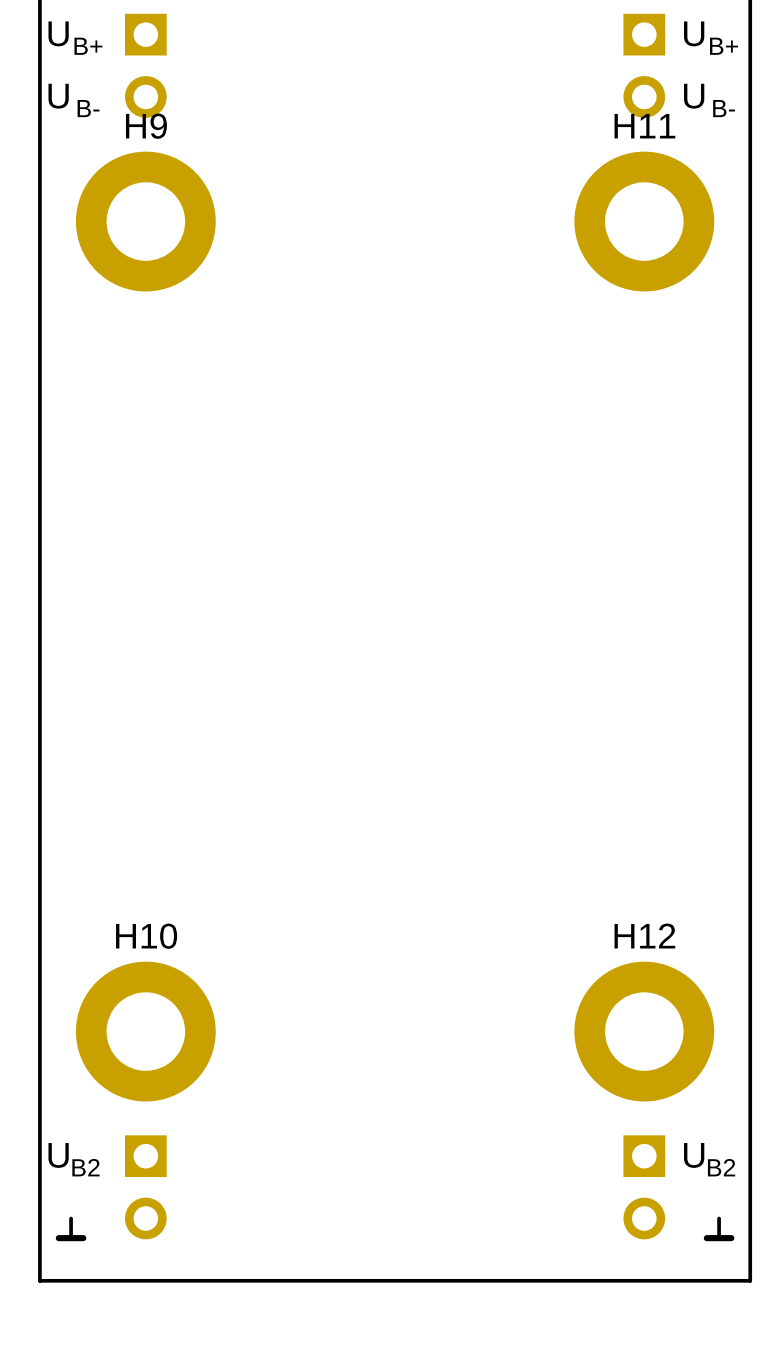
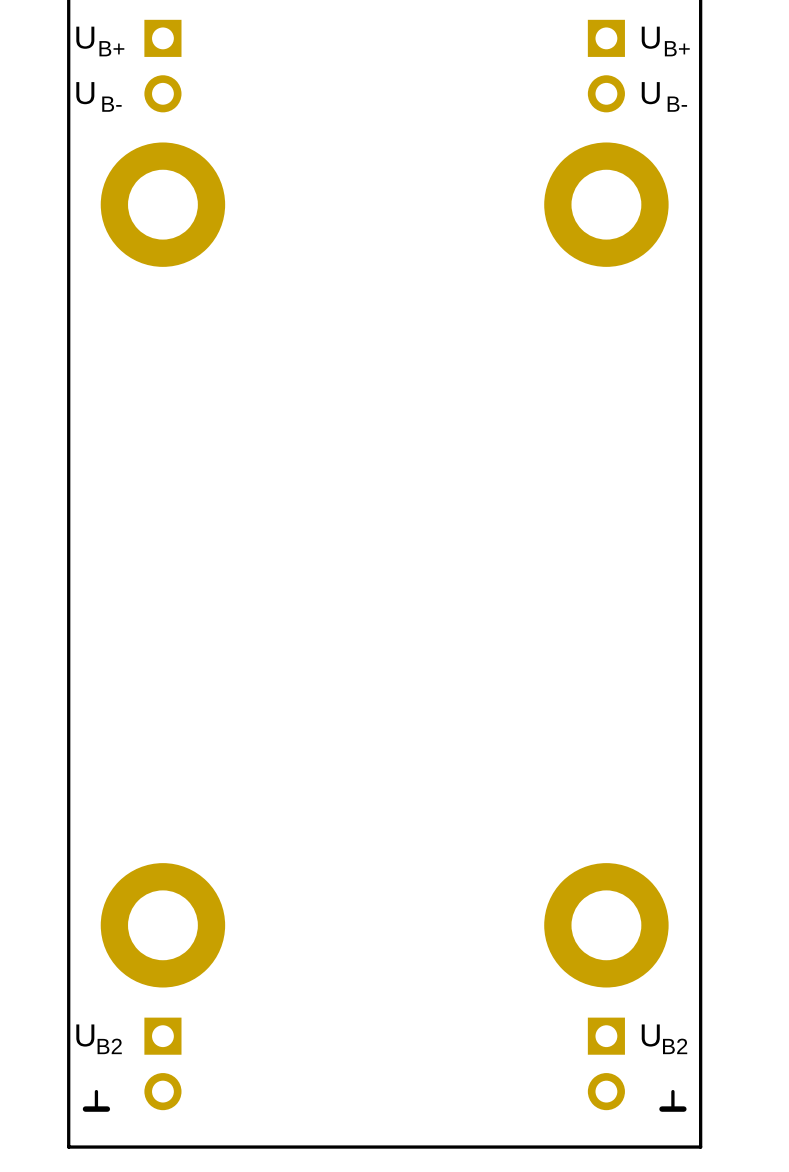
H9 name: H9 (146, 126) -> none
H11 name: H11 (644, 126) -> none
H10 name: H10 (146, 936) -> none
H12 name: H12 (644, 936) -> none

